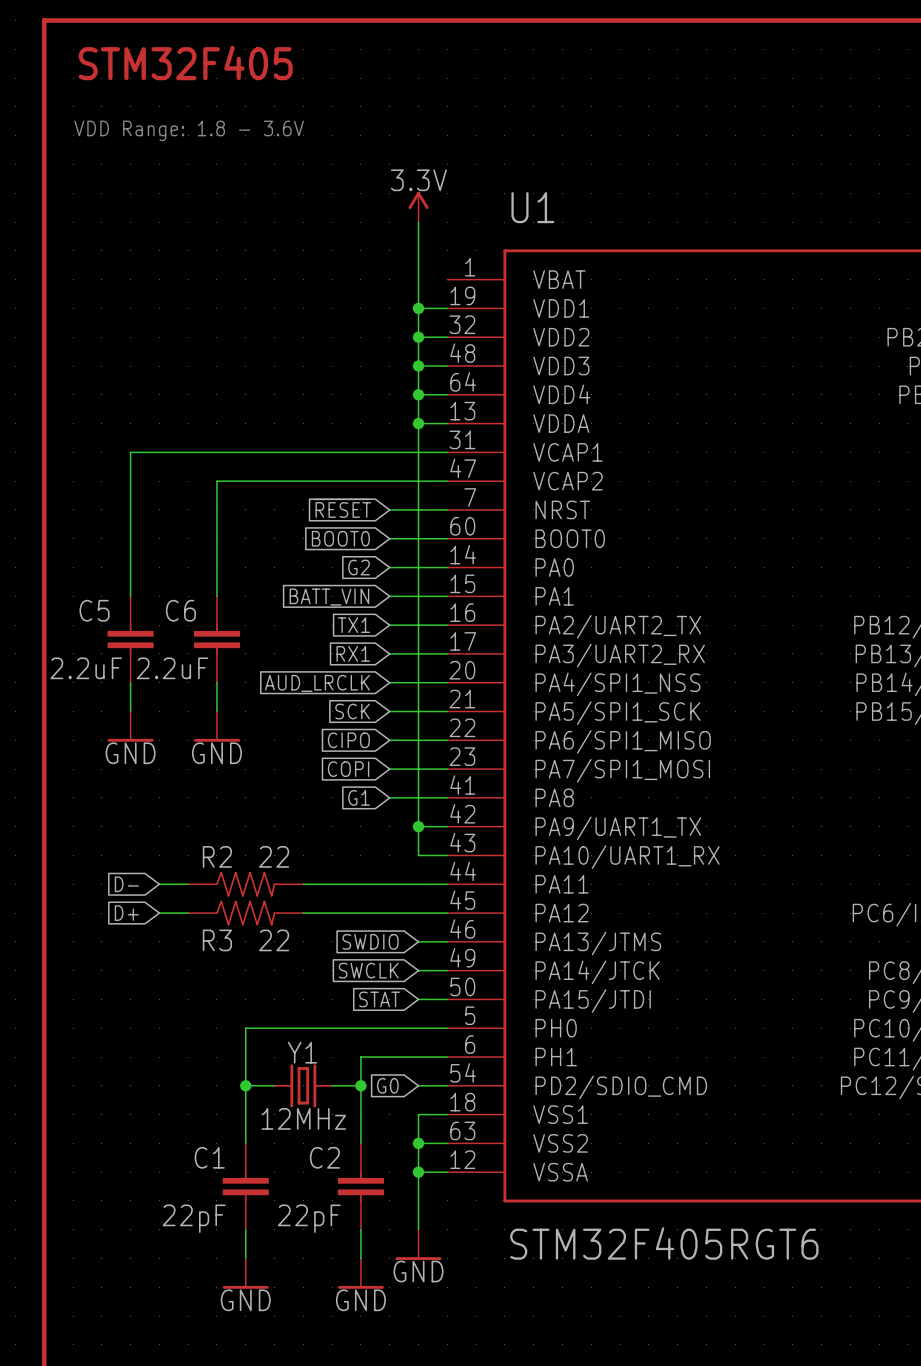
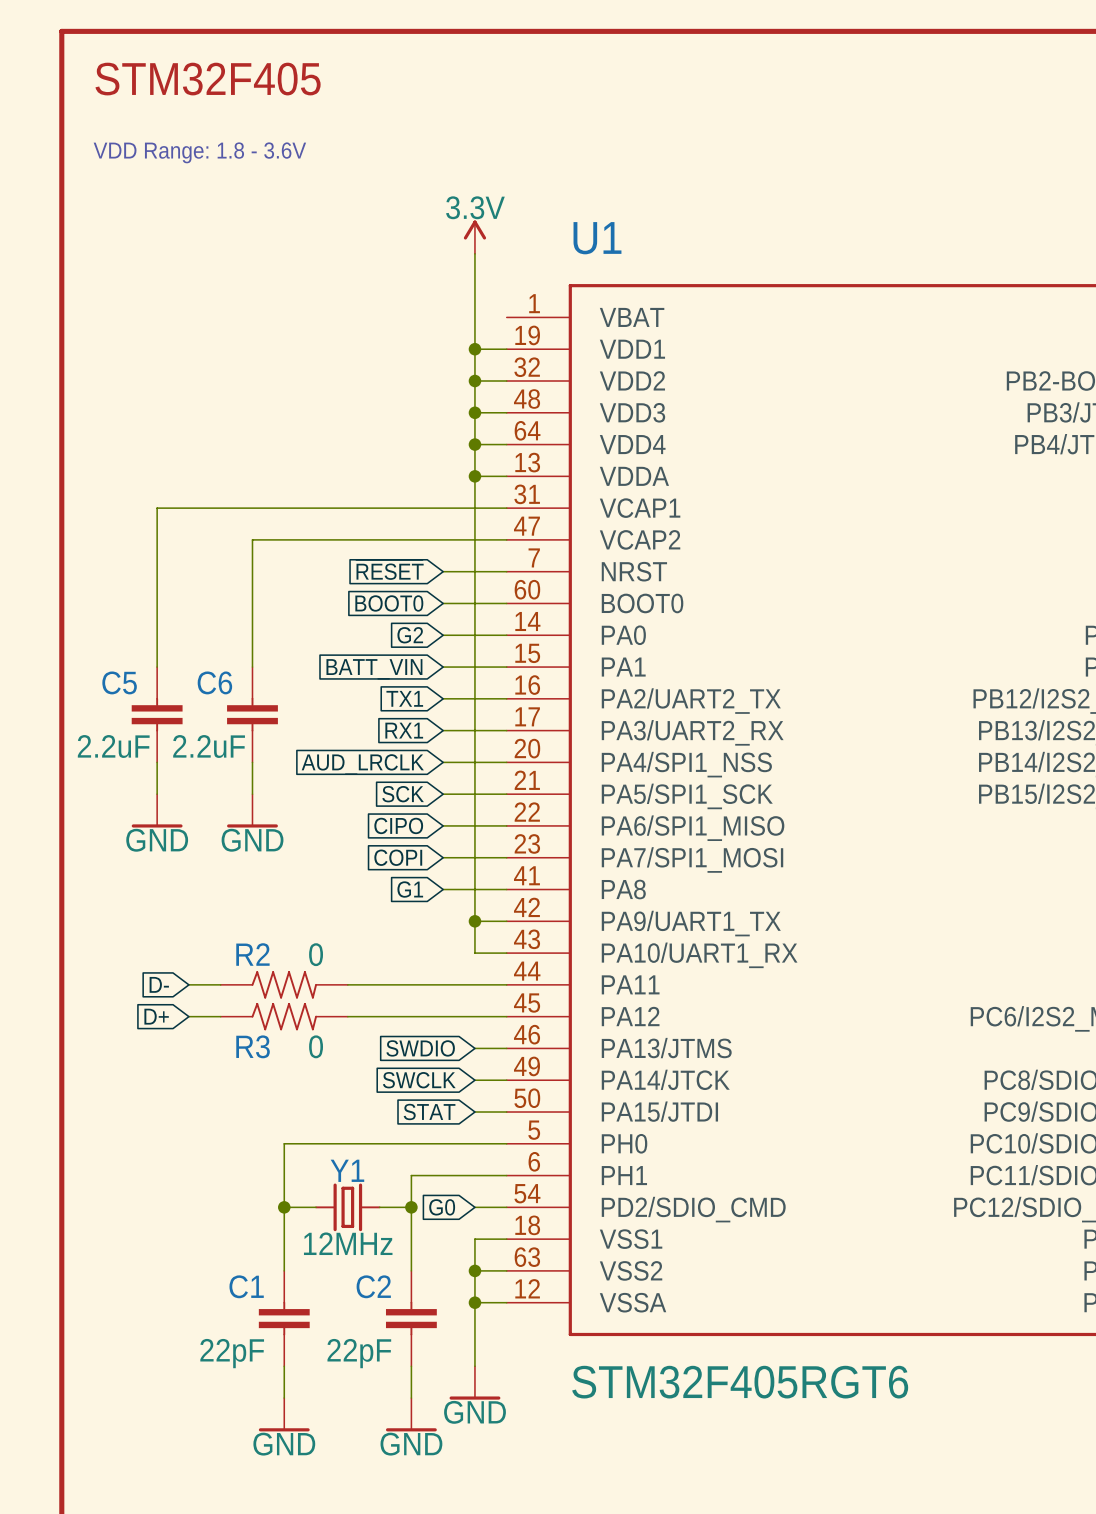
R2 value: 22 (274, 856) -> 0 (316, 954)
R3 value: 22 (274, 940) -> 0 (316, 1046)

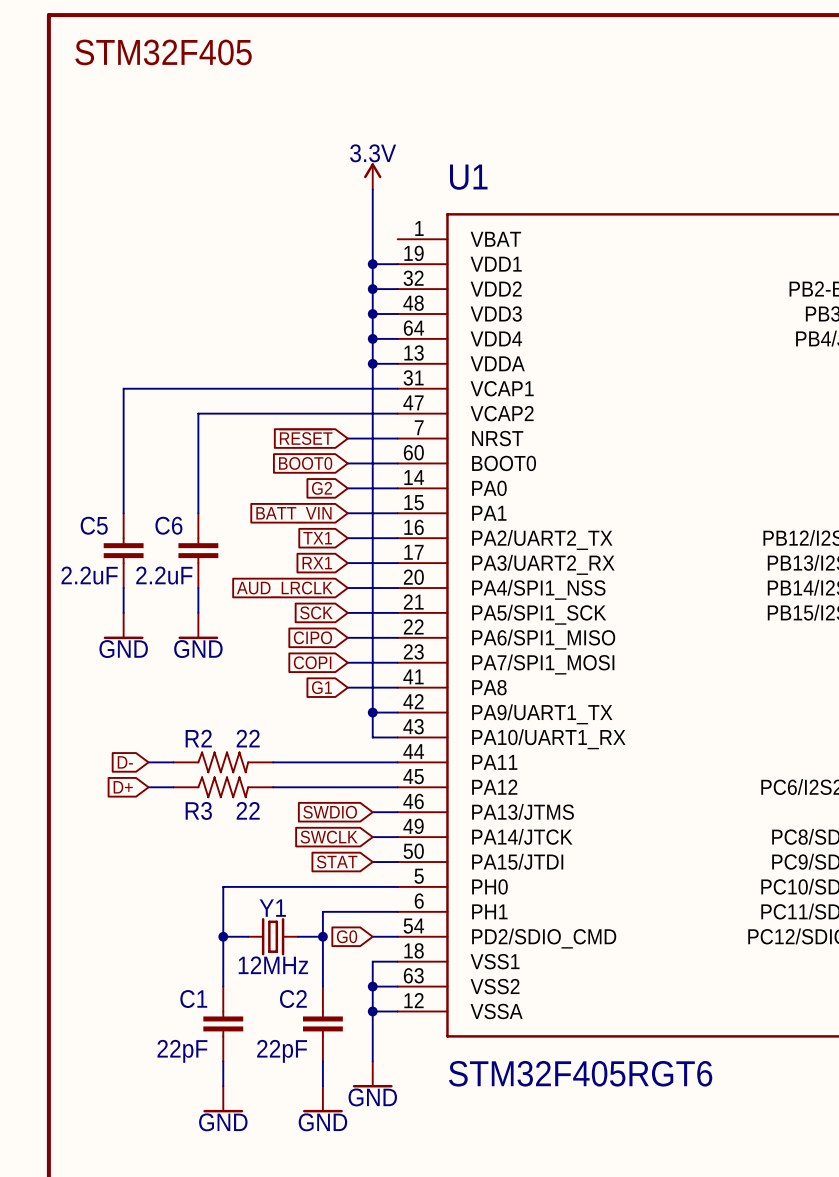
text: VDD Range: 1.8 - 3.6V (199, 152) -> none
R2 value: 0 (316, 954) -> 22 (248, 738)
R3 value: 0 (316, 1046) -> 22 (248, 810)

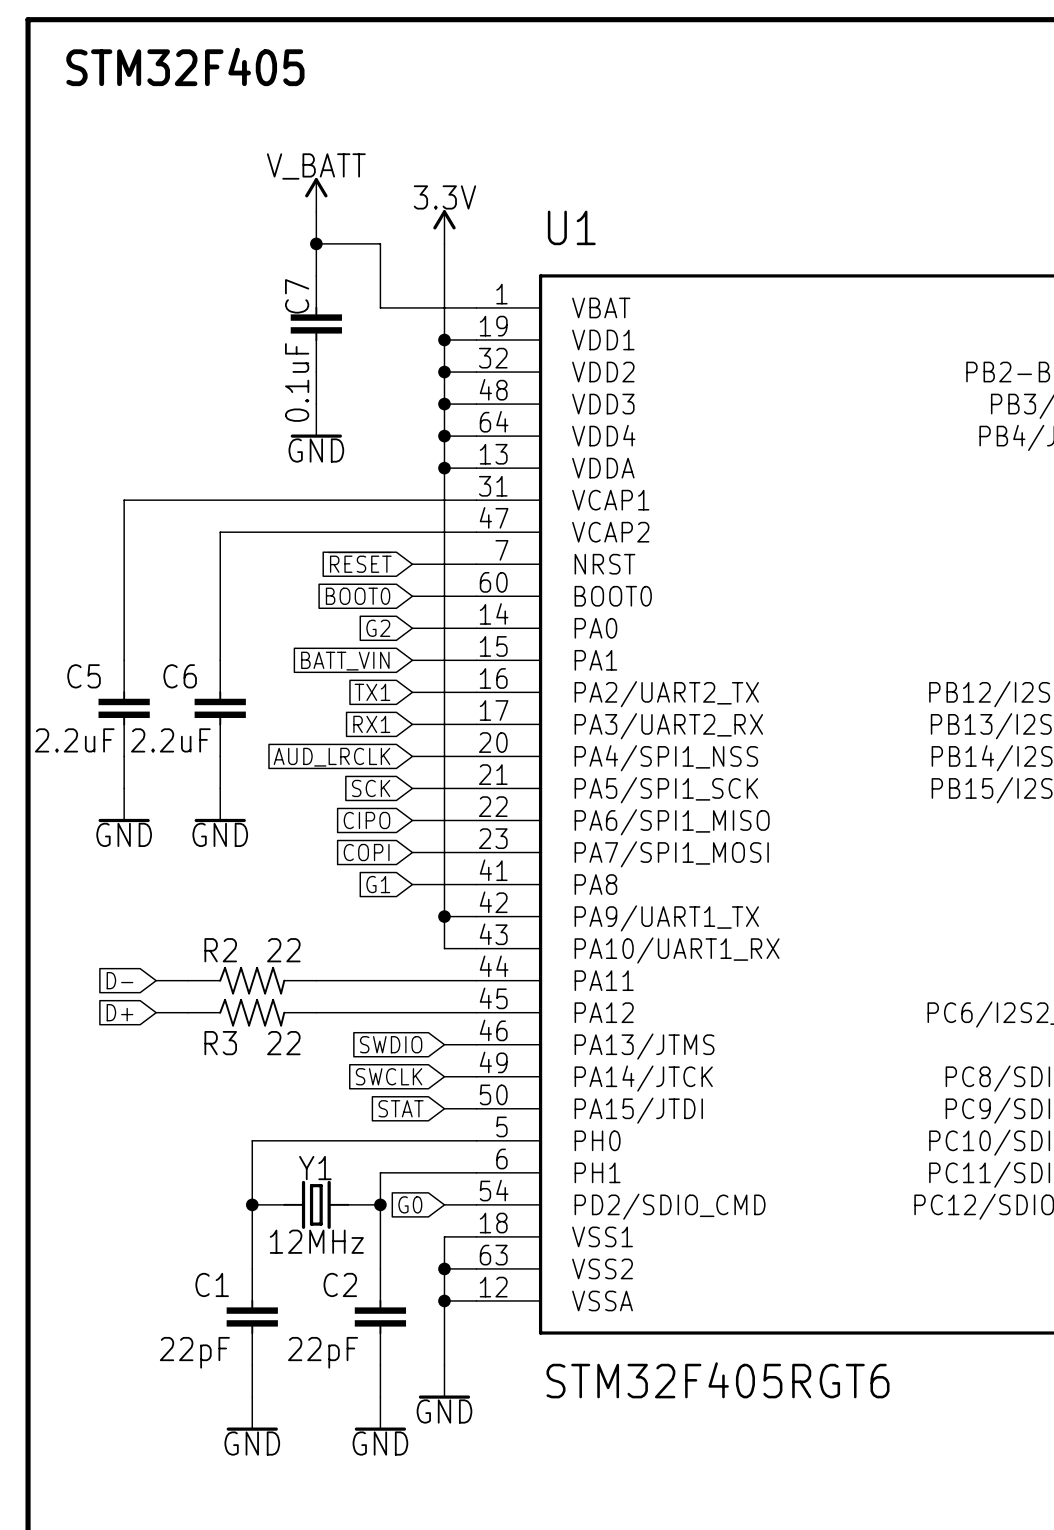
power symbol: none -> V_BATT (316, 195)
wire: none -> (316, 211) (316, 275)
wire: none -> (316, 243) (380, 243) (380, 307) (476, 307)
junction: none -> (316, 243)
C7: none -> 0.1uF (316, 323)
wire: none -> (316, 372) (316, 404)
power symbol: none -> GND (316, 420)

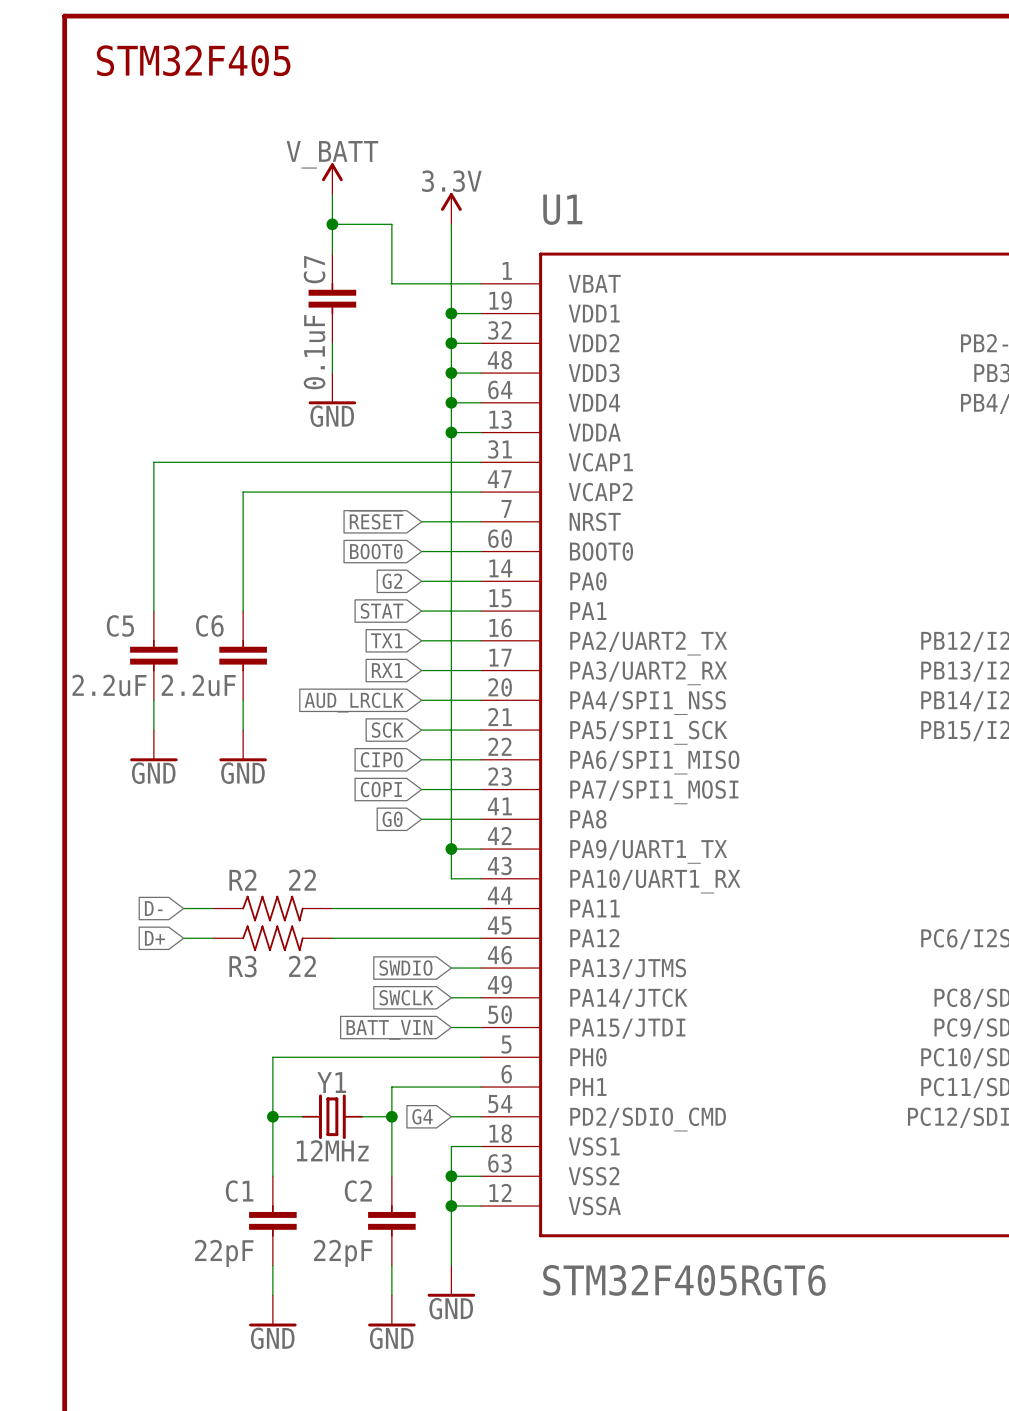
global label: BATT_VIN (345, 661) -> STAT (382, 611)
global label: G1 (378, 884) -> G0 (392, 819)
global label: STAT (401, 1108) -> BATT_VIN (389, 1029)
global label: G0 (410, 1204) -> G4 (422, 1116)

